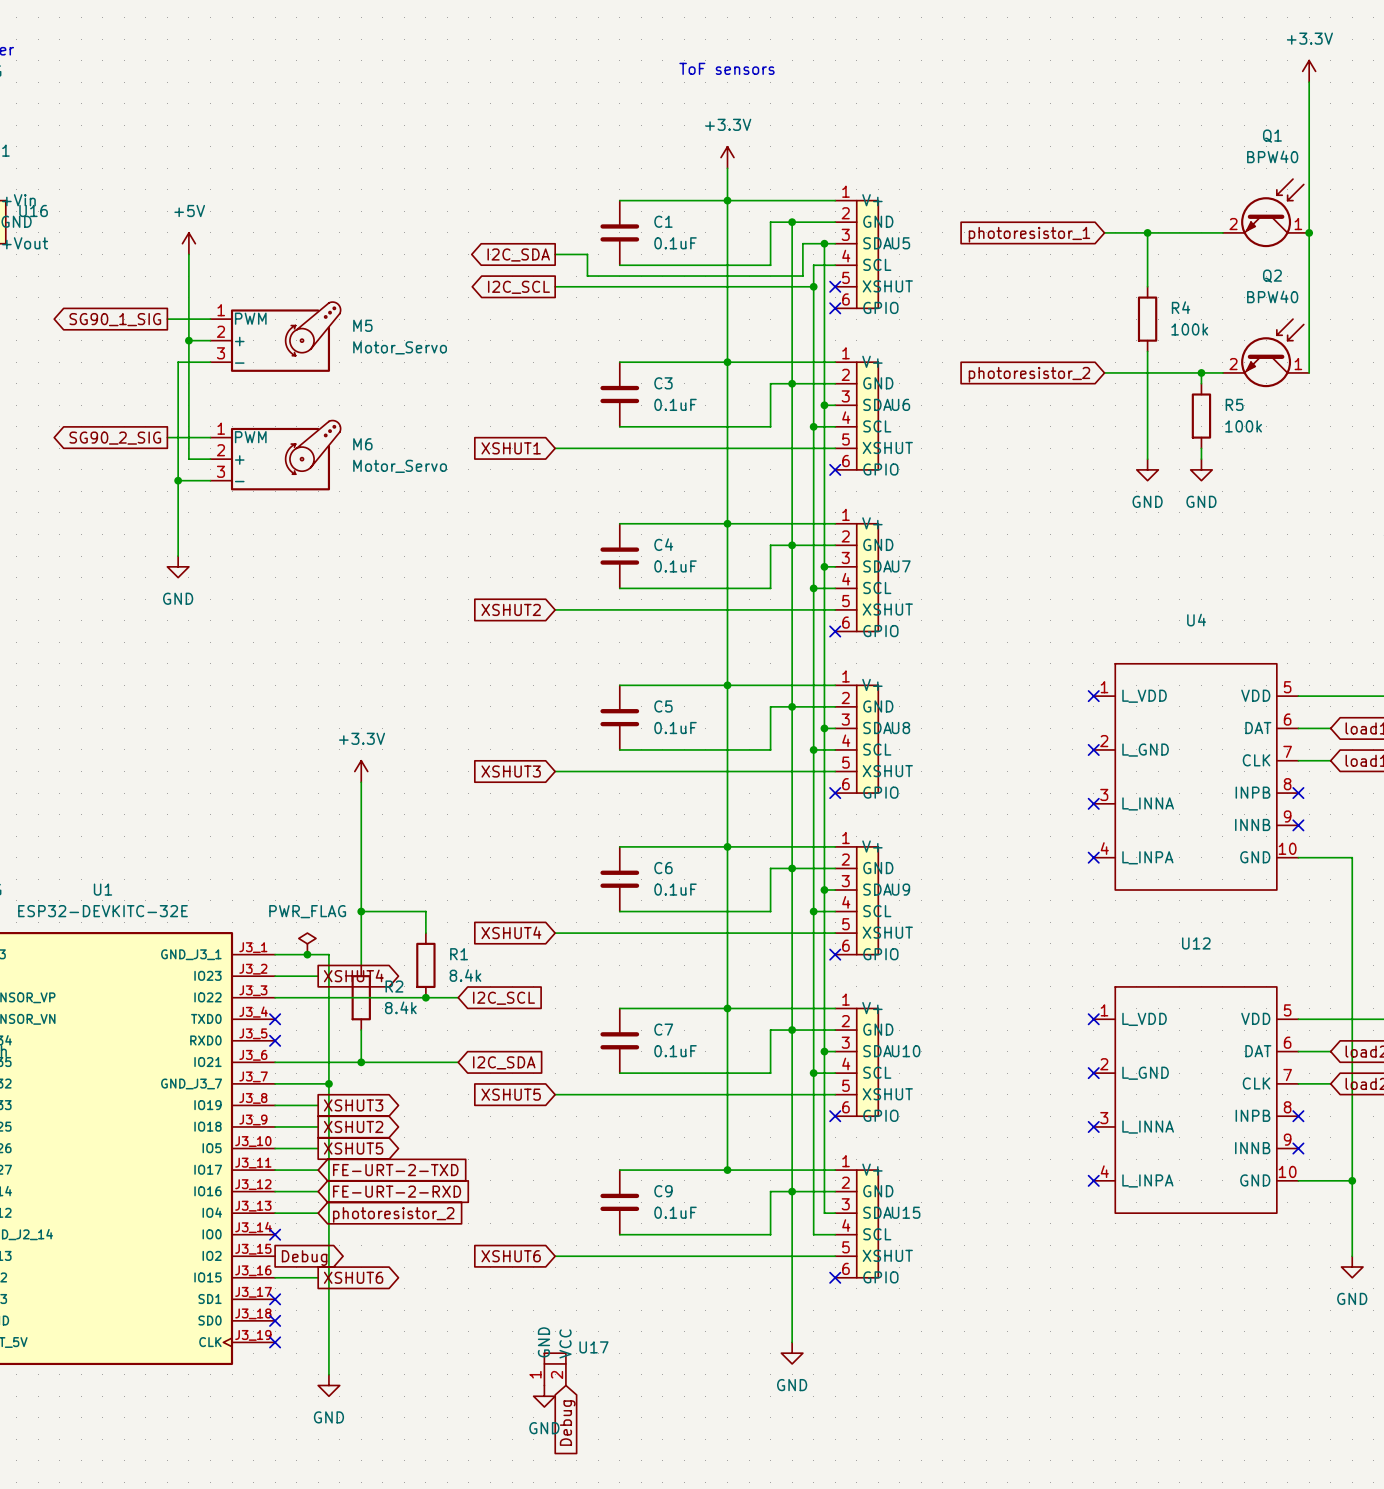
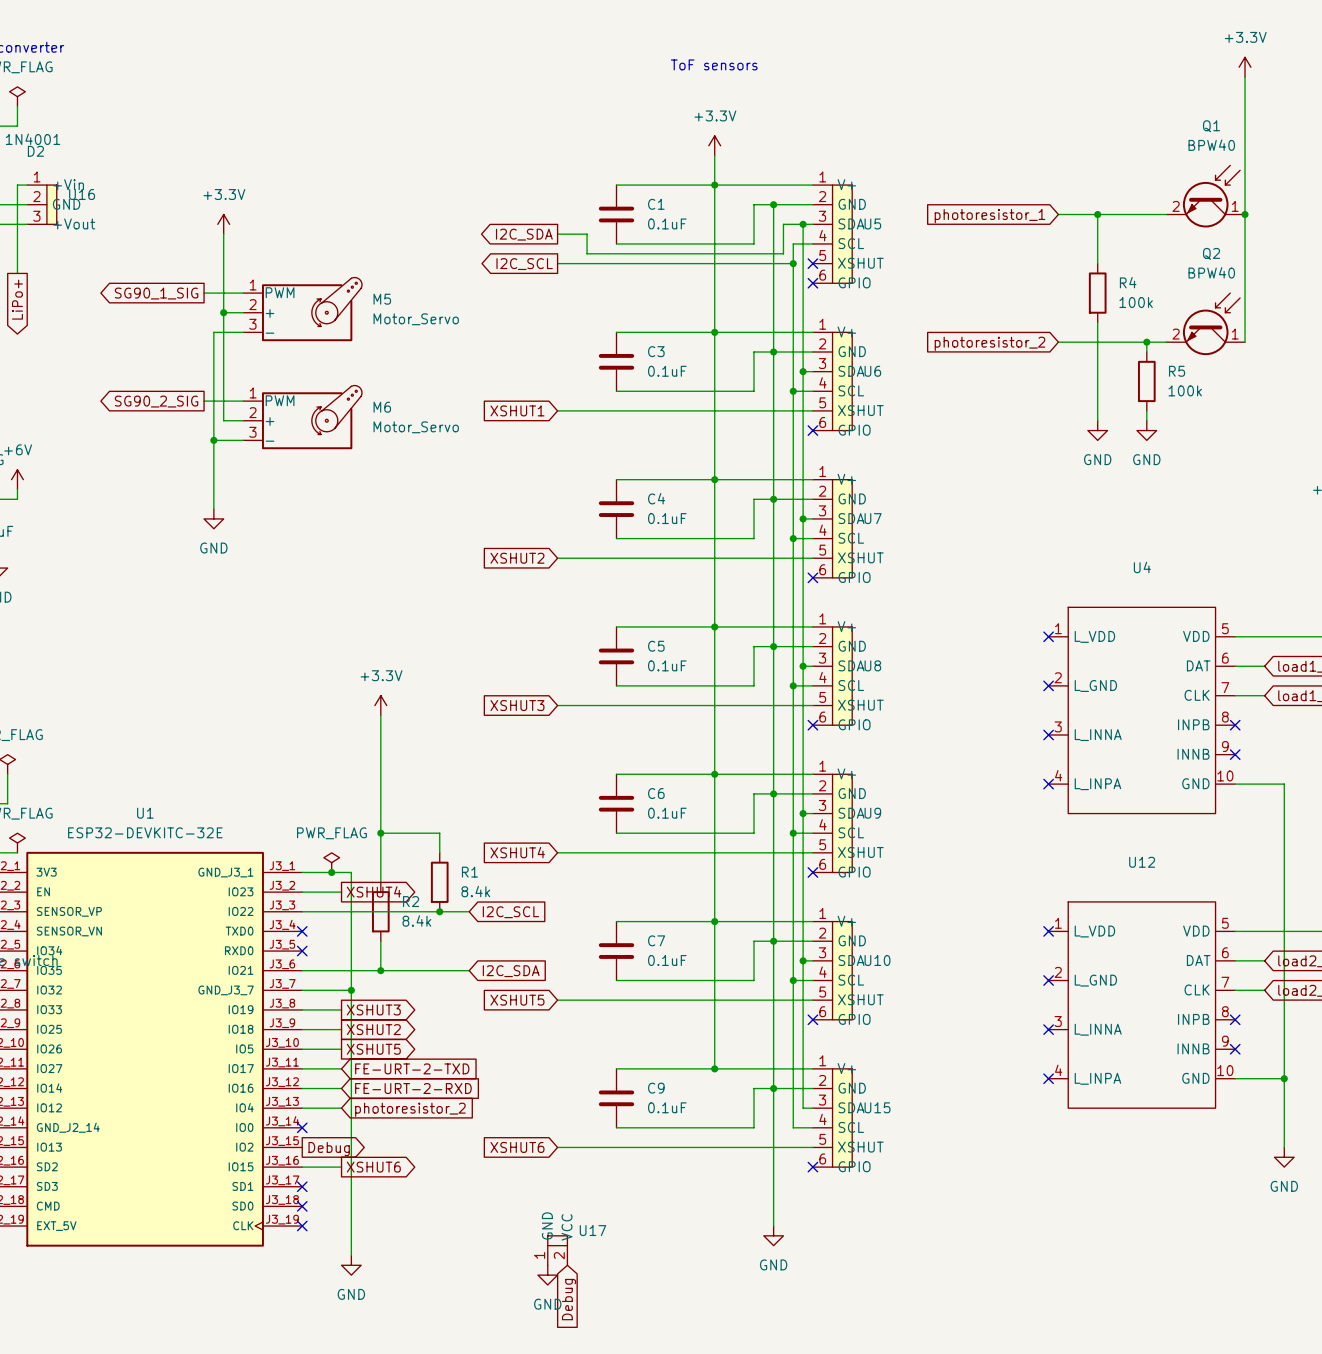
power symbol: +5V (188, 243) -> +3.3V (223, 224)

